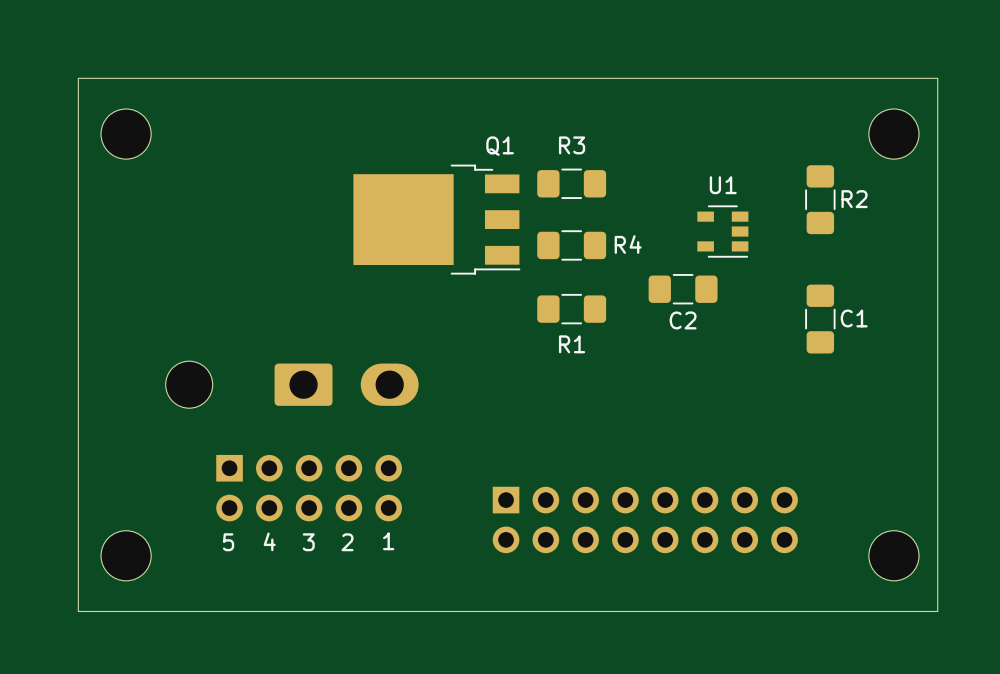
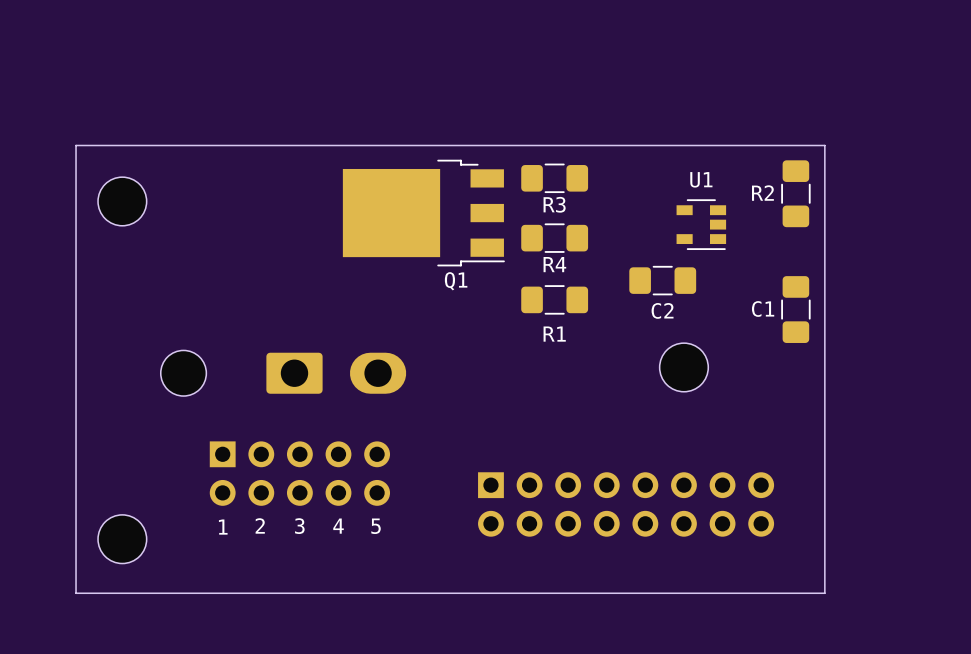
part position: (126, 134) -> (122, 201)
part: (893, 134) -> none
R3 name position: R3 (572, 145) -> R3 (554, 204)
Q1 name position: Q1 (500, 146) -> Q1 (456, 281)
board edge: (78, 149) (78, 78) (937, 78) (937, 611) (850, 611) -> (76, 145) (824, 145) (824, 593)
R2 name position: R2 (854, 199) -> R2 (762, 193)
R4 name position: R4 (628, 244) -> R4 (554, 264)
C1 name position: C1 (854, 318) -> C1 (763, 308)
part: none -> (683, 367)
text: 4 (269, 541) -> 2 (260, 525)
text: 1 (388, 541) -> 5 (376, 526)
text: 5 (228, 542) -> 1 (223, 527)
text: 2 (347, 542) -> 4 (338, 526)
part: (893, 555) -> none

